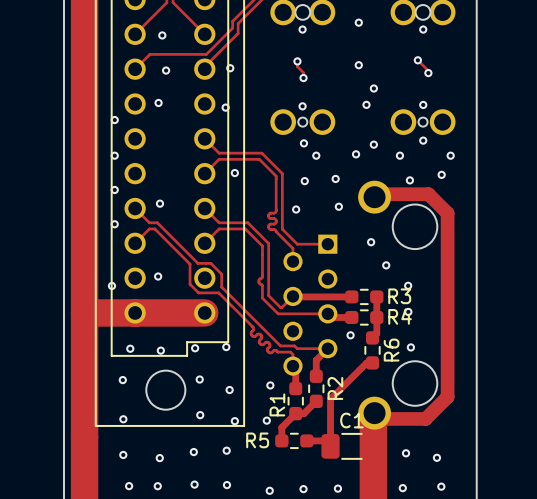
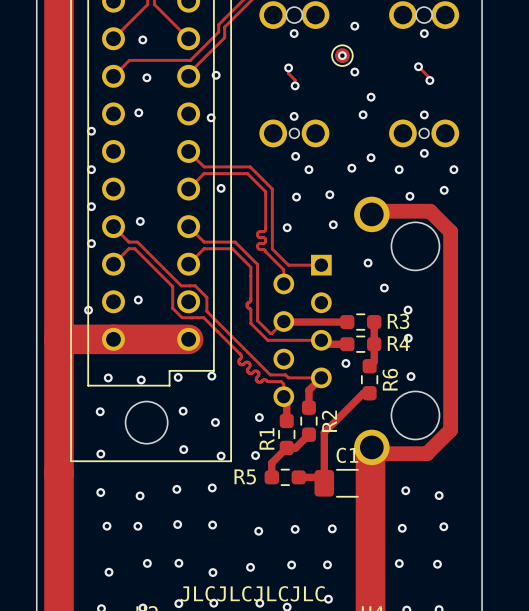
part: none -> (342, 55)
via: none -> (342, 55)

